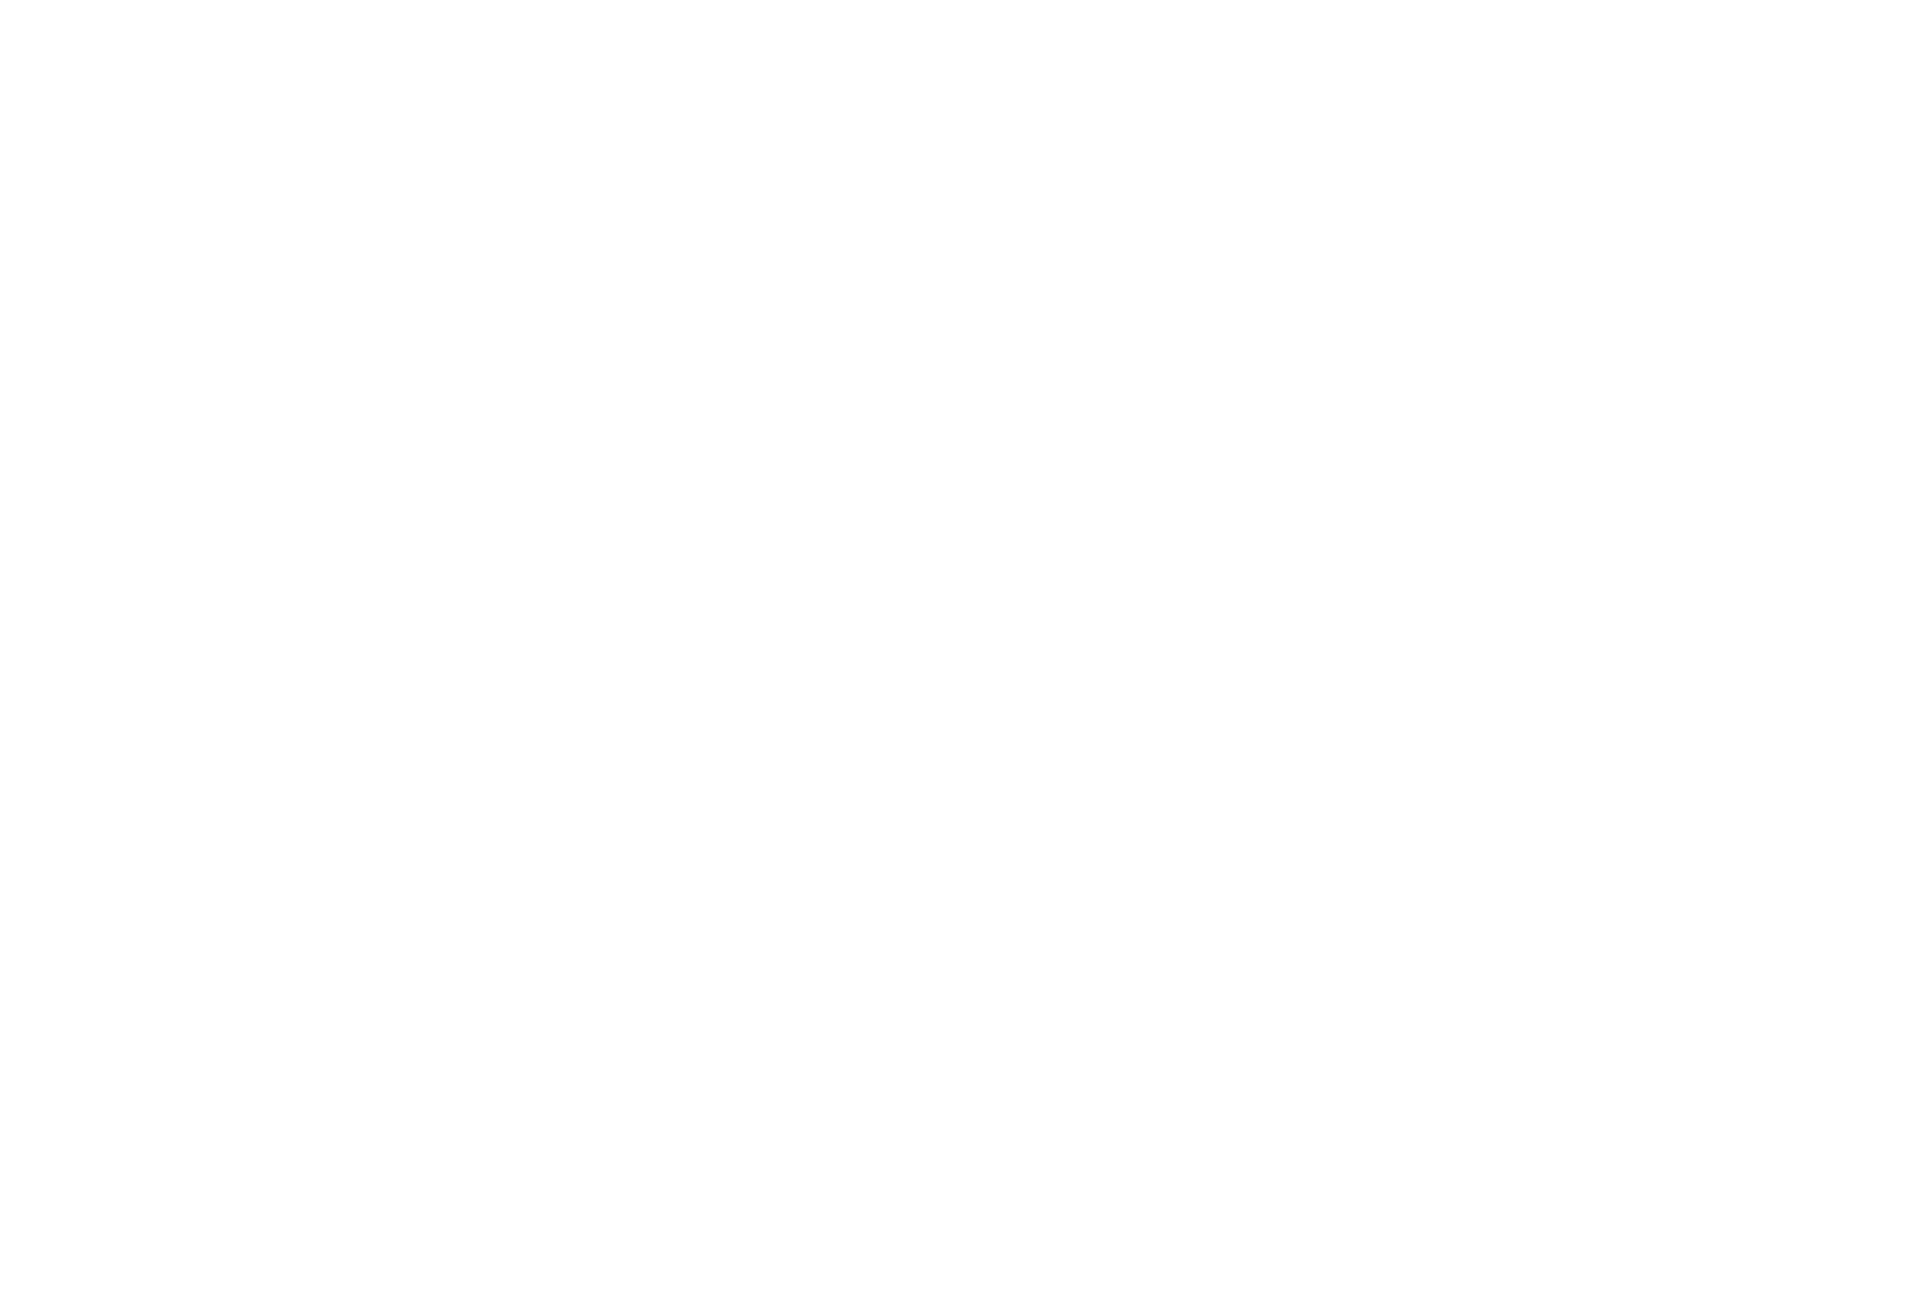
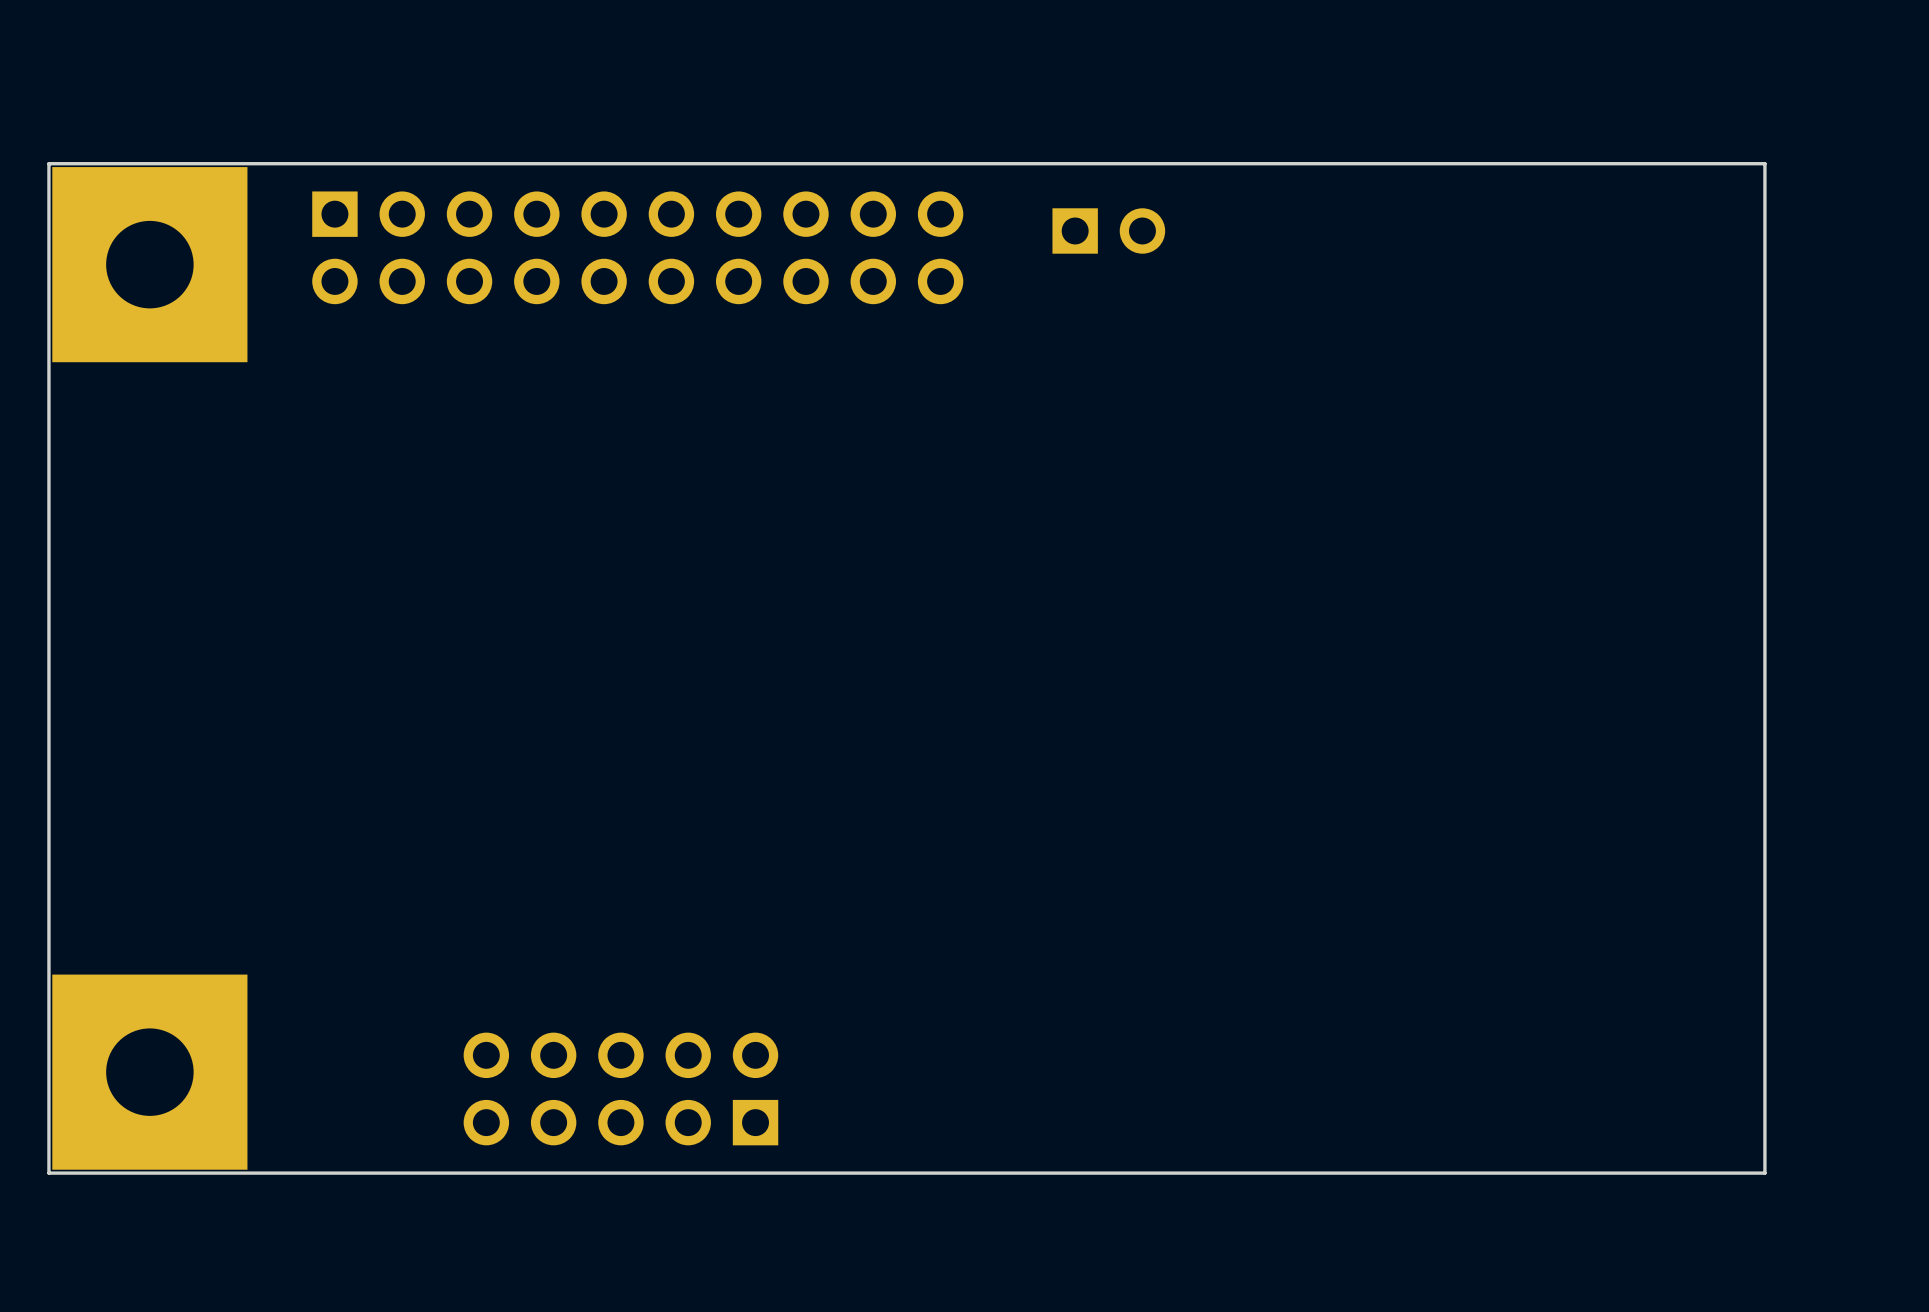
board edge: none -> (1764, 163) (1764, 1173) (48, 1173) (48, 163) (1764, 163)
part: none -> (1108, 230)
part: none -> (637, 247)
part: none -> (149, 264)
part: none -> (149, 1072)
part: none -> (620, 1088)

